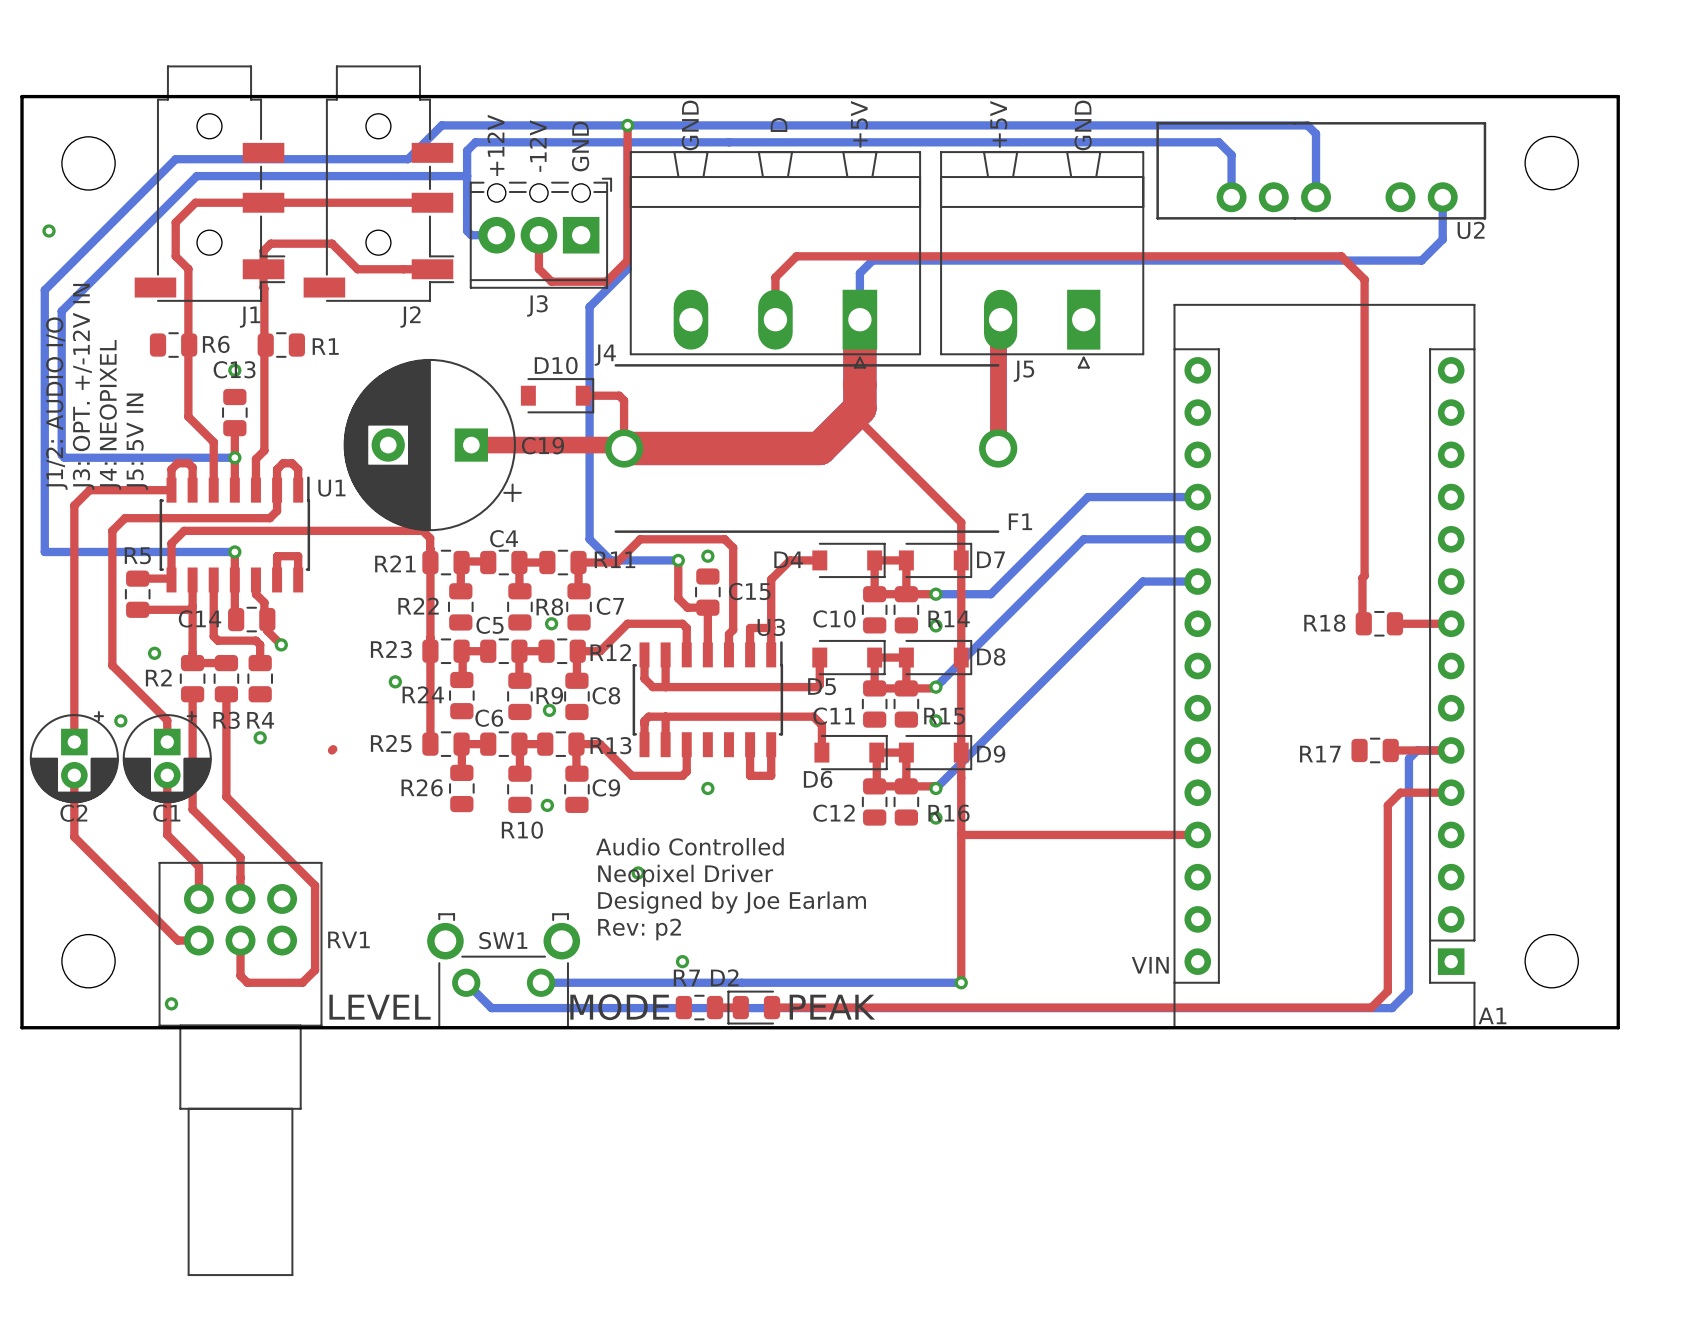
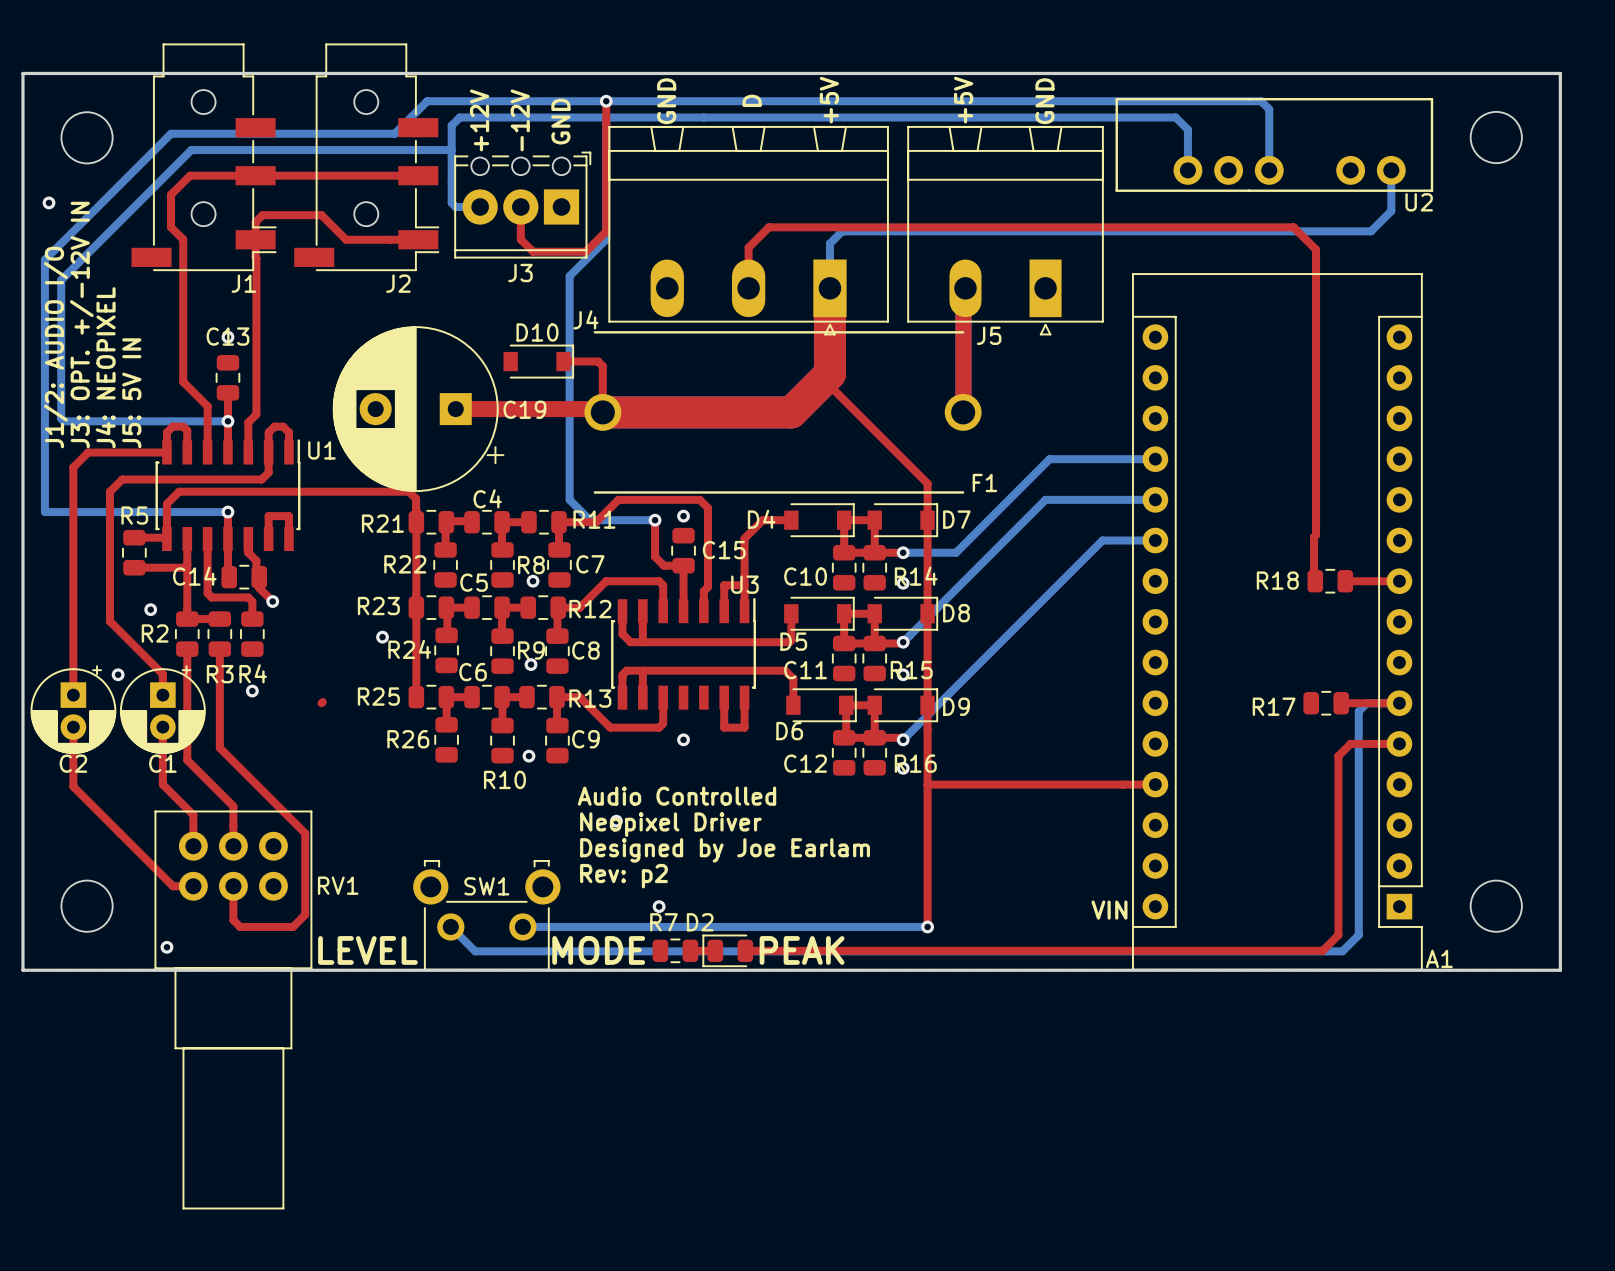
R6: (173, 345) -> none
R1: (281, 345) -> none

